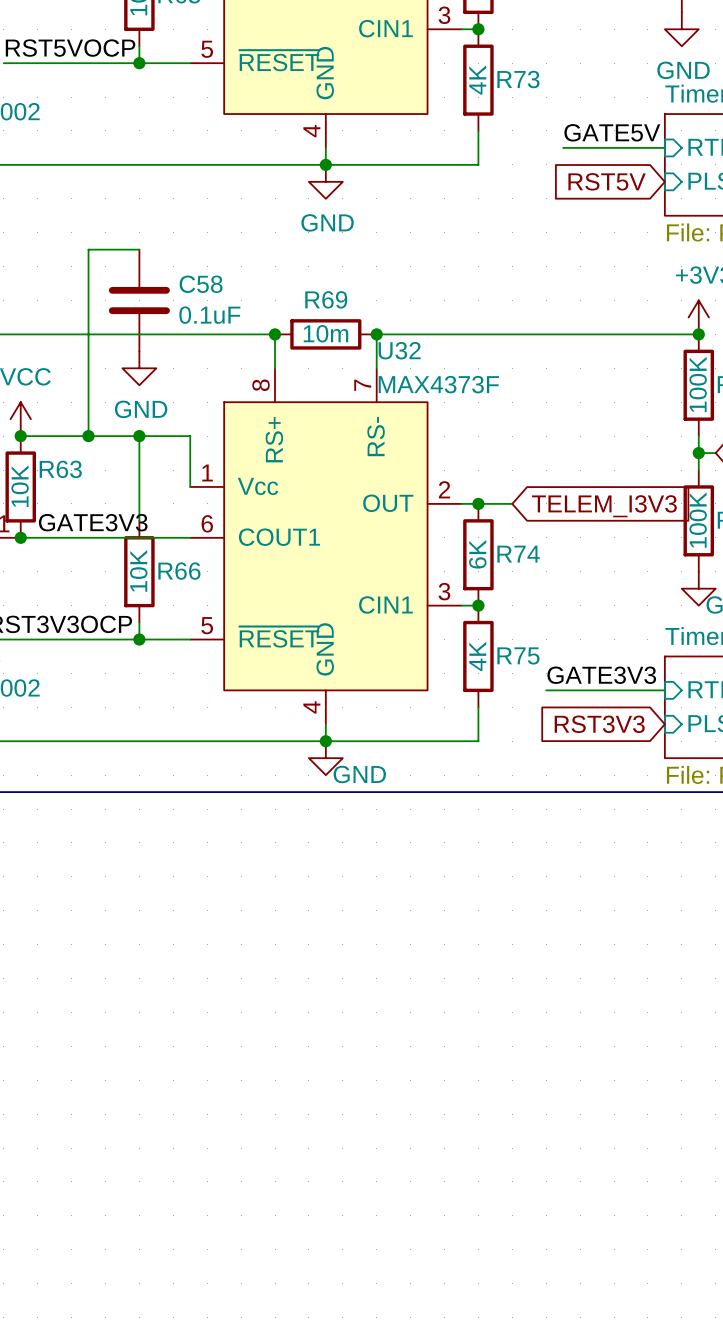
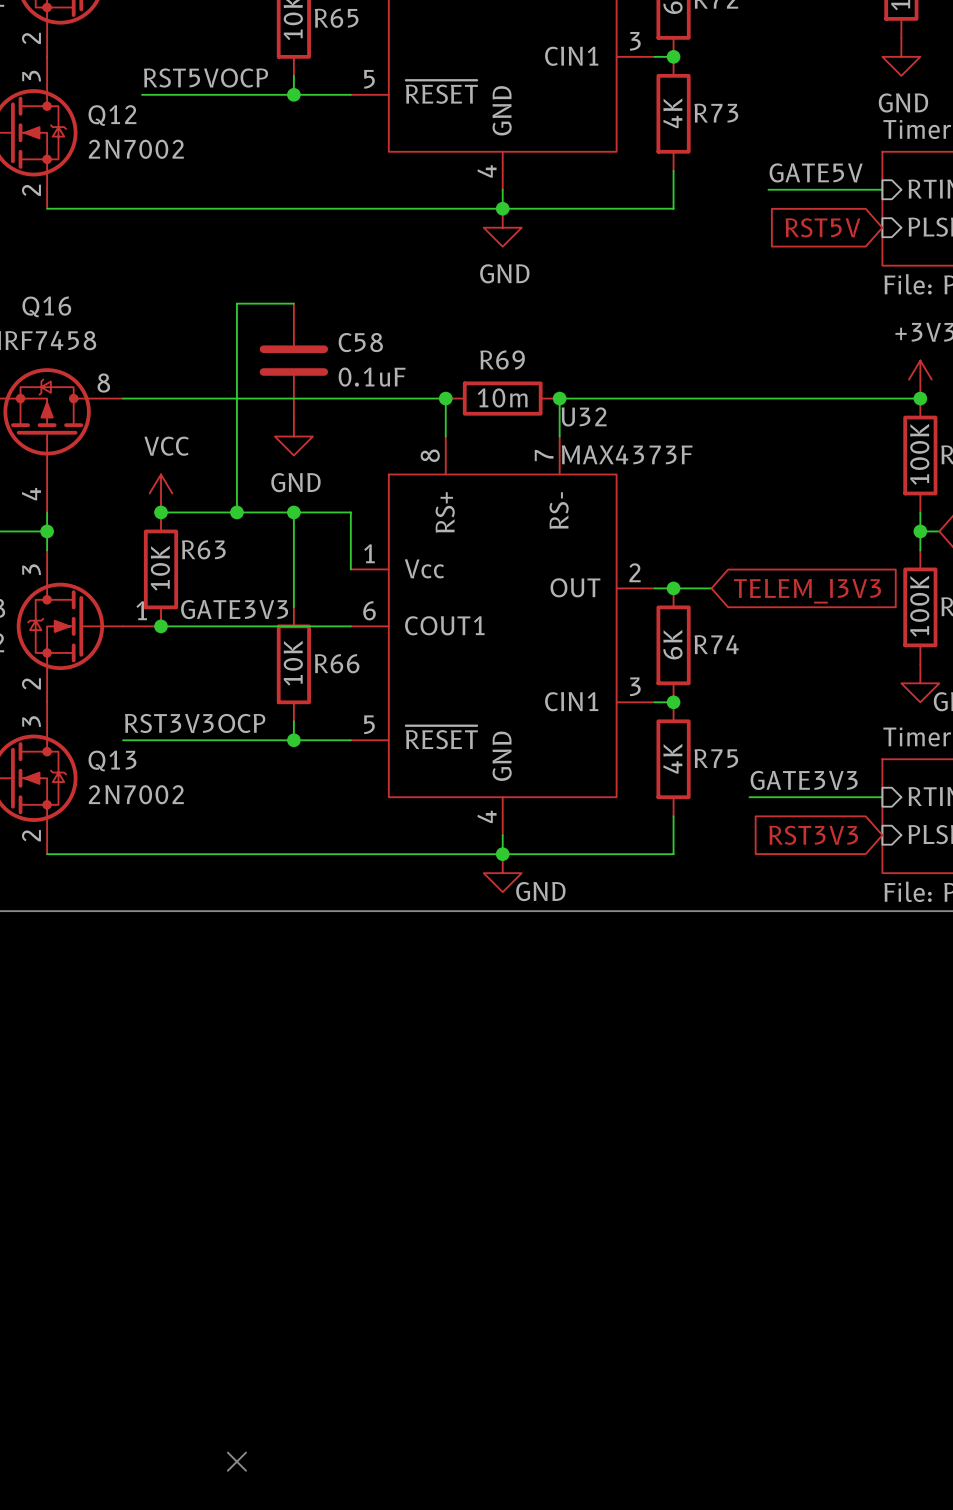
no-connect mark: none -> (236, 1461)

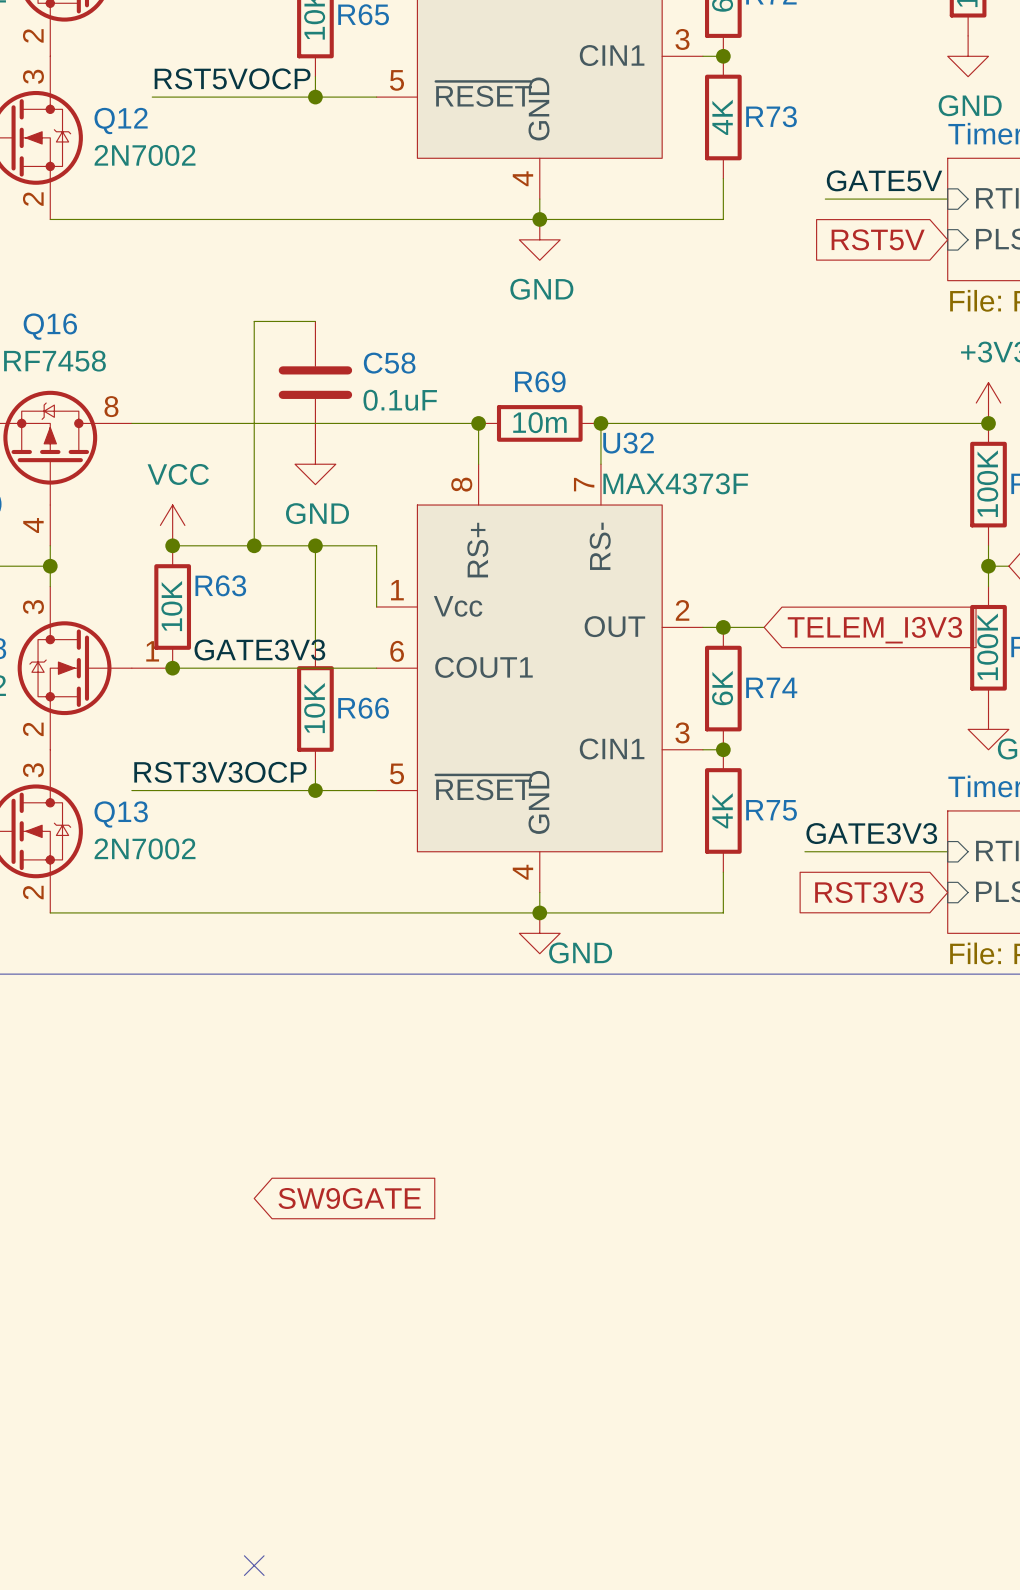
global label: none -> SW9GATE (349, 1198)

